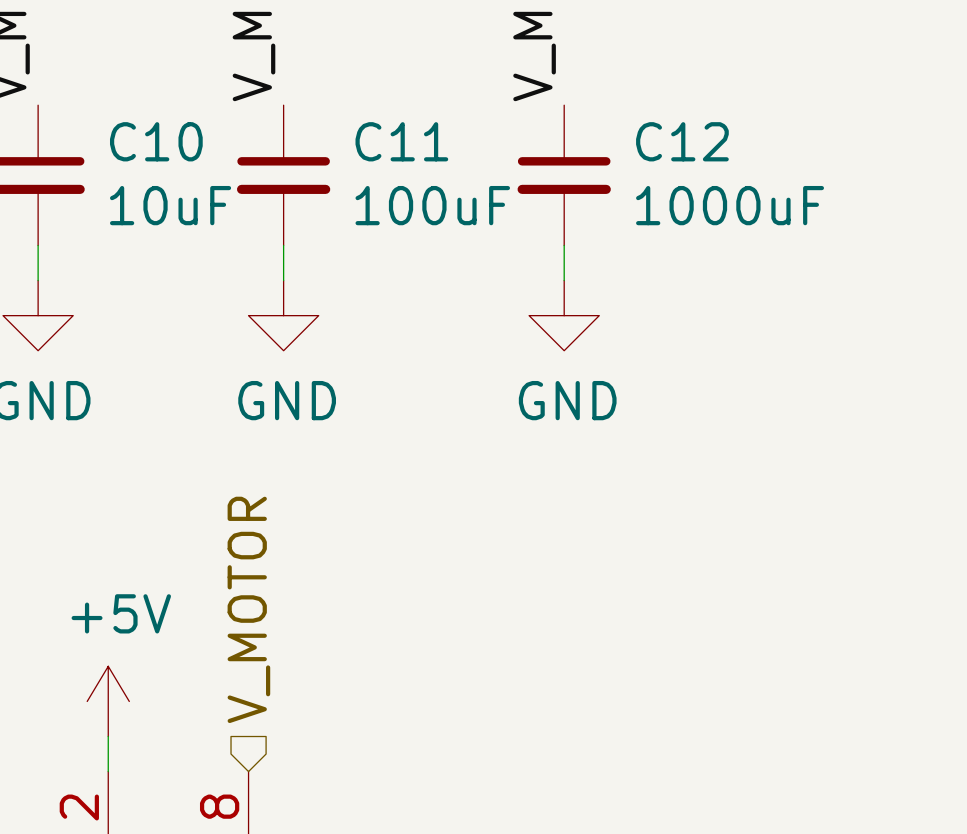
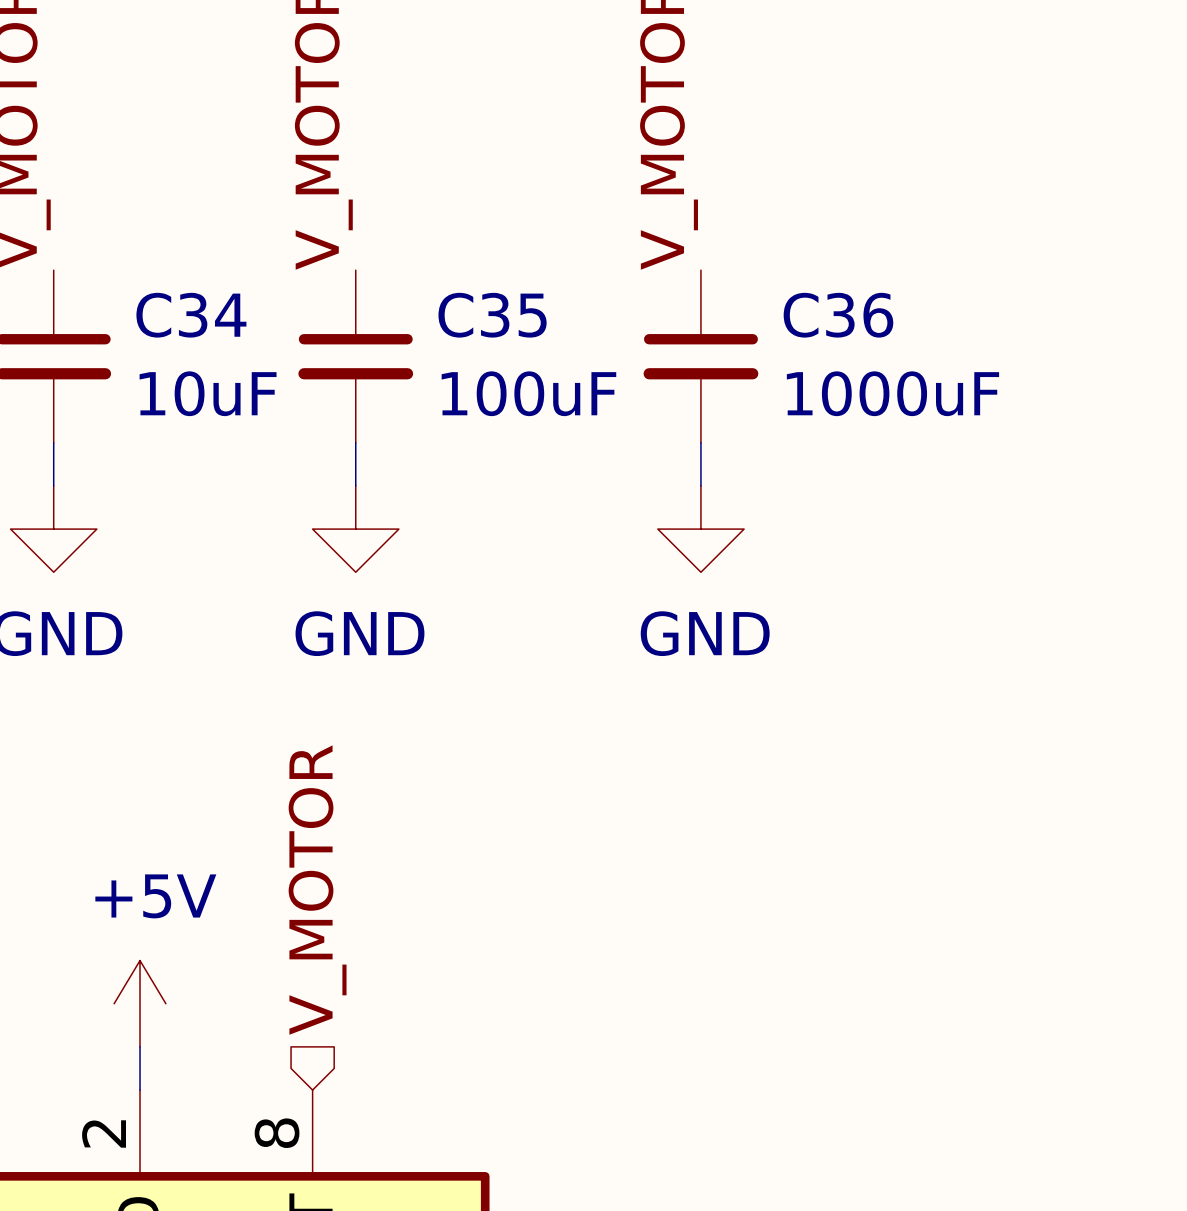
C10 name: C10 (156, 141) -> C34 (191, 315)
C11 name: C11 (401, 141) -> C35 (492, 315)
C12 name: C12 (682, 141) -> C36 (838, 315)

